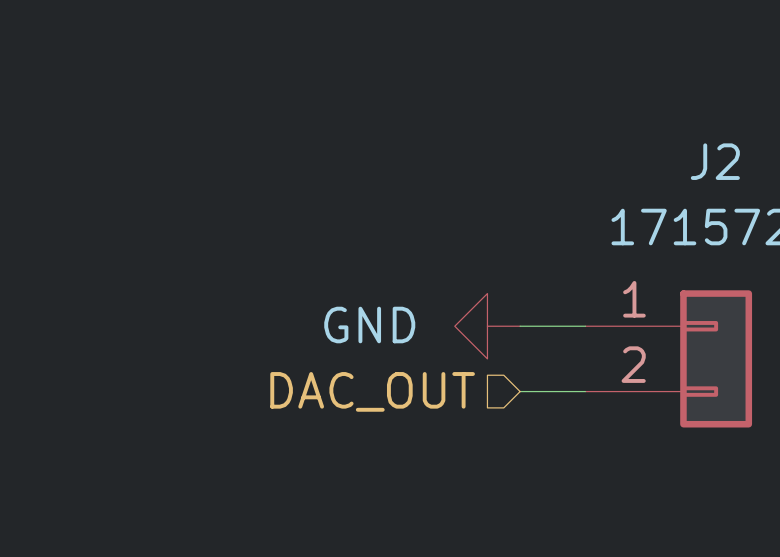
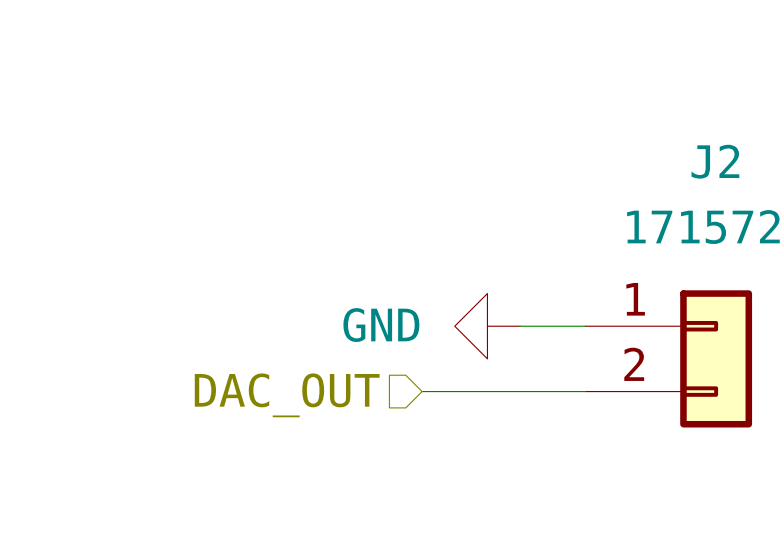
hierarchical label position: DAC_OUT (372, 391) -> DAC_OUT (287, 395)
wire: none -> (422, 391) (520, 391)

